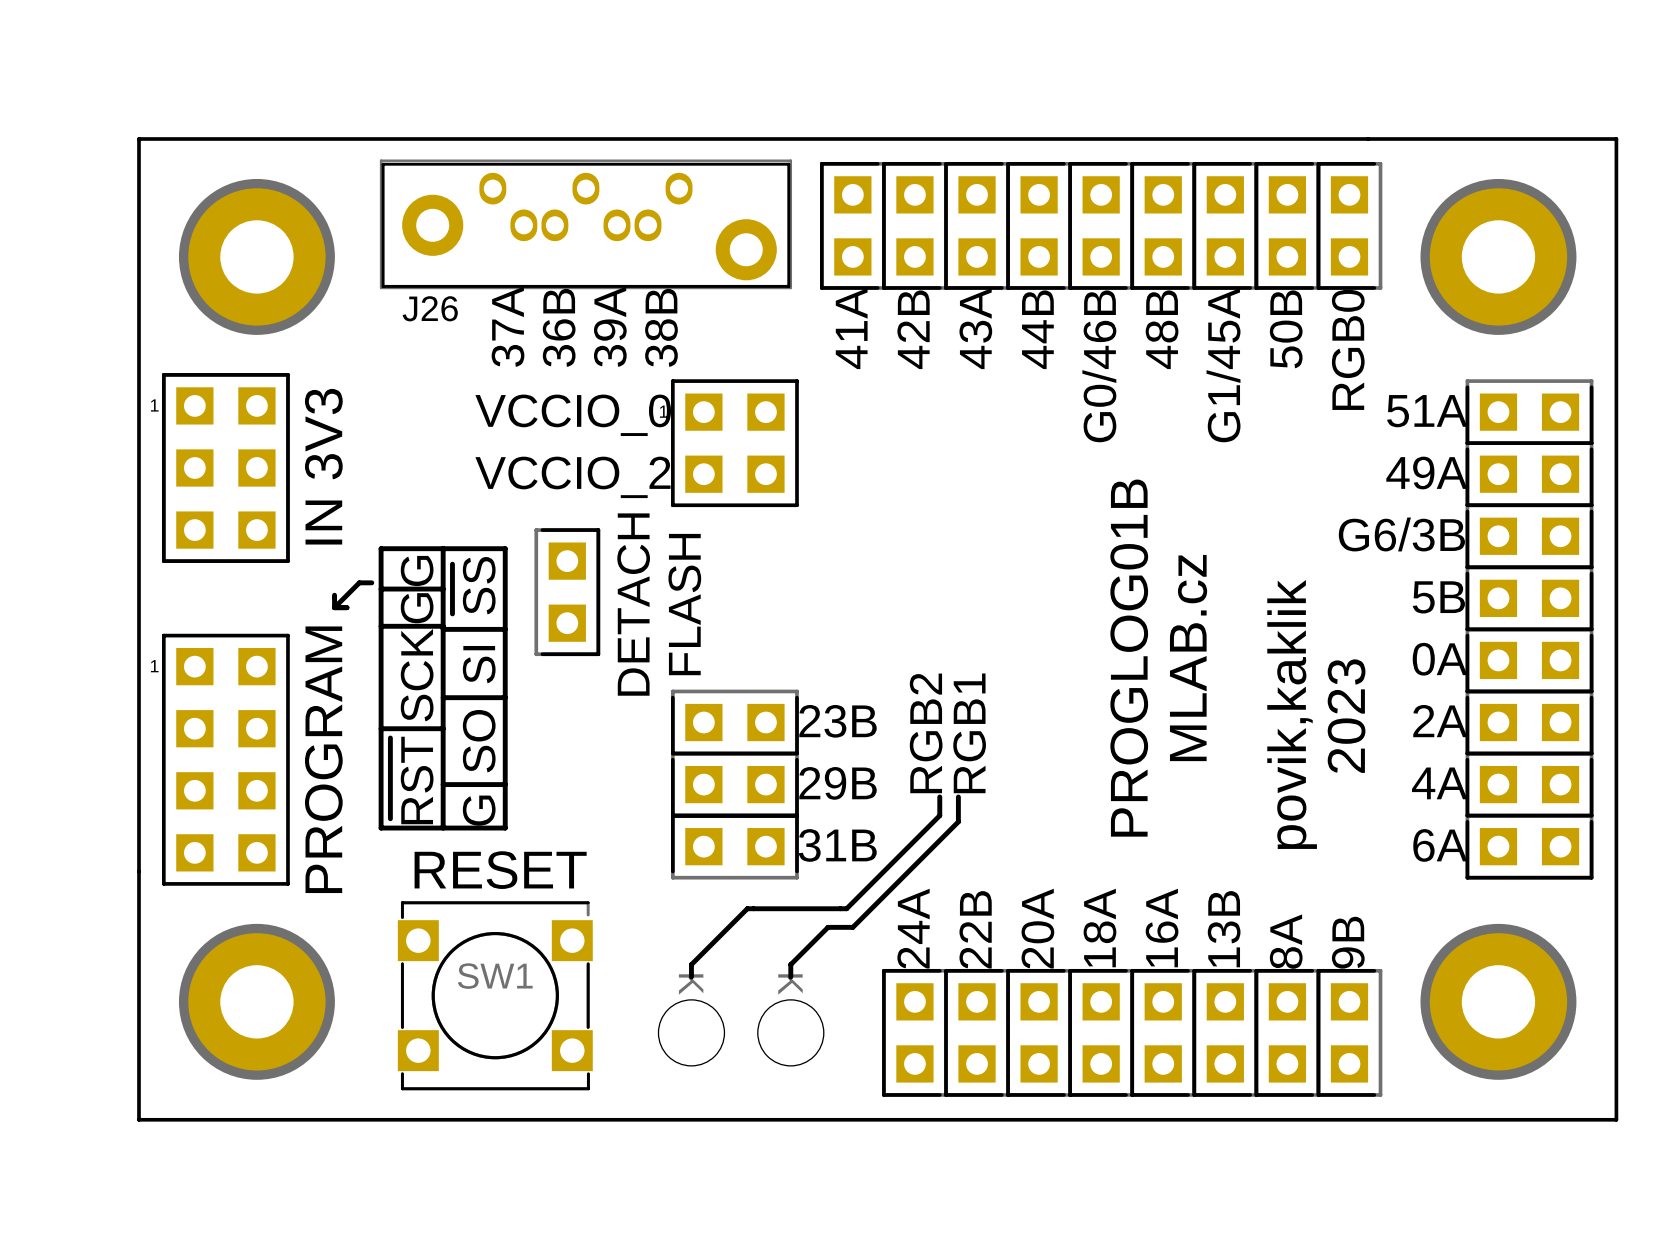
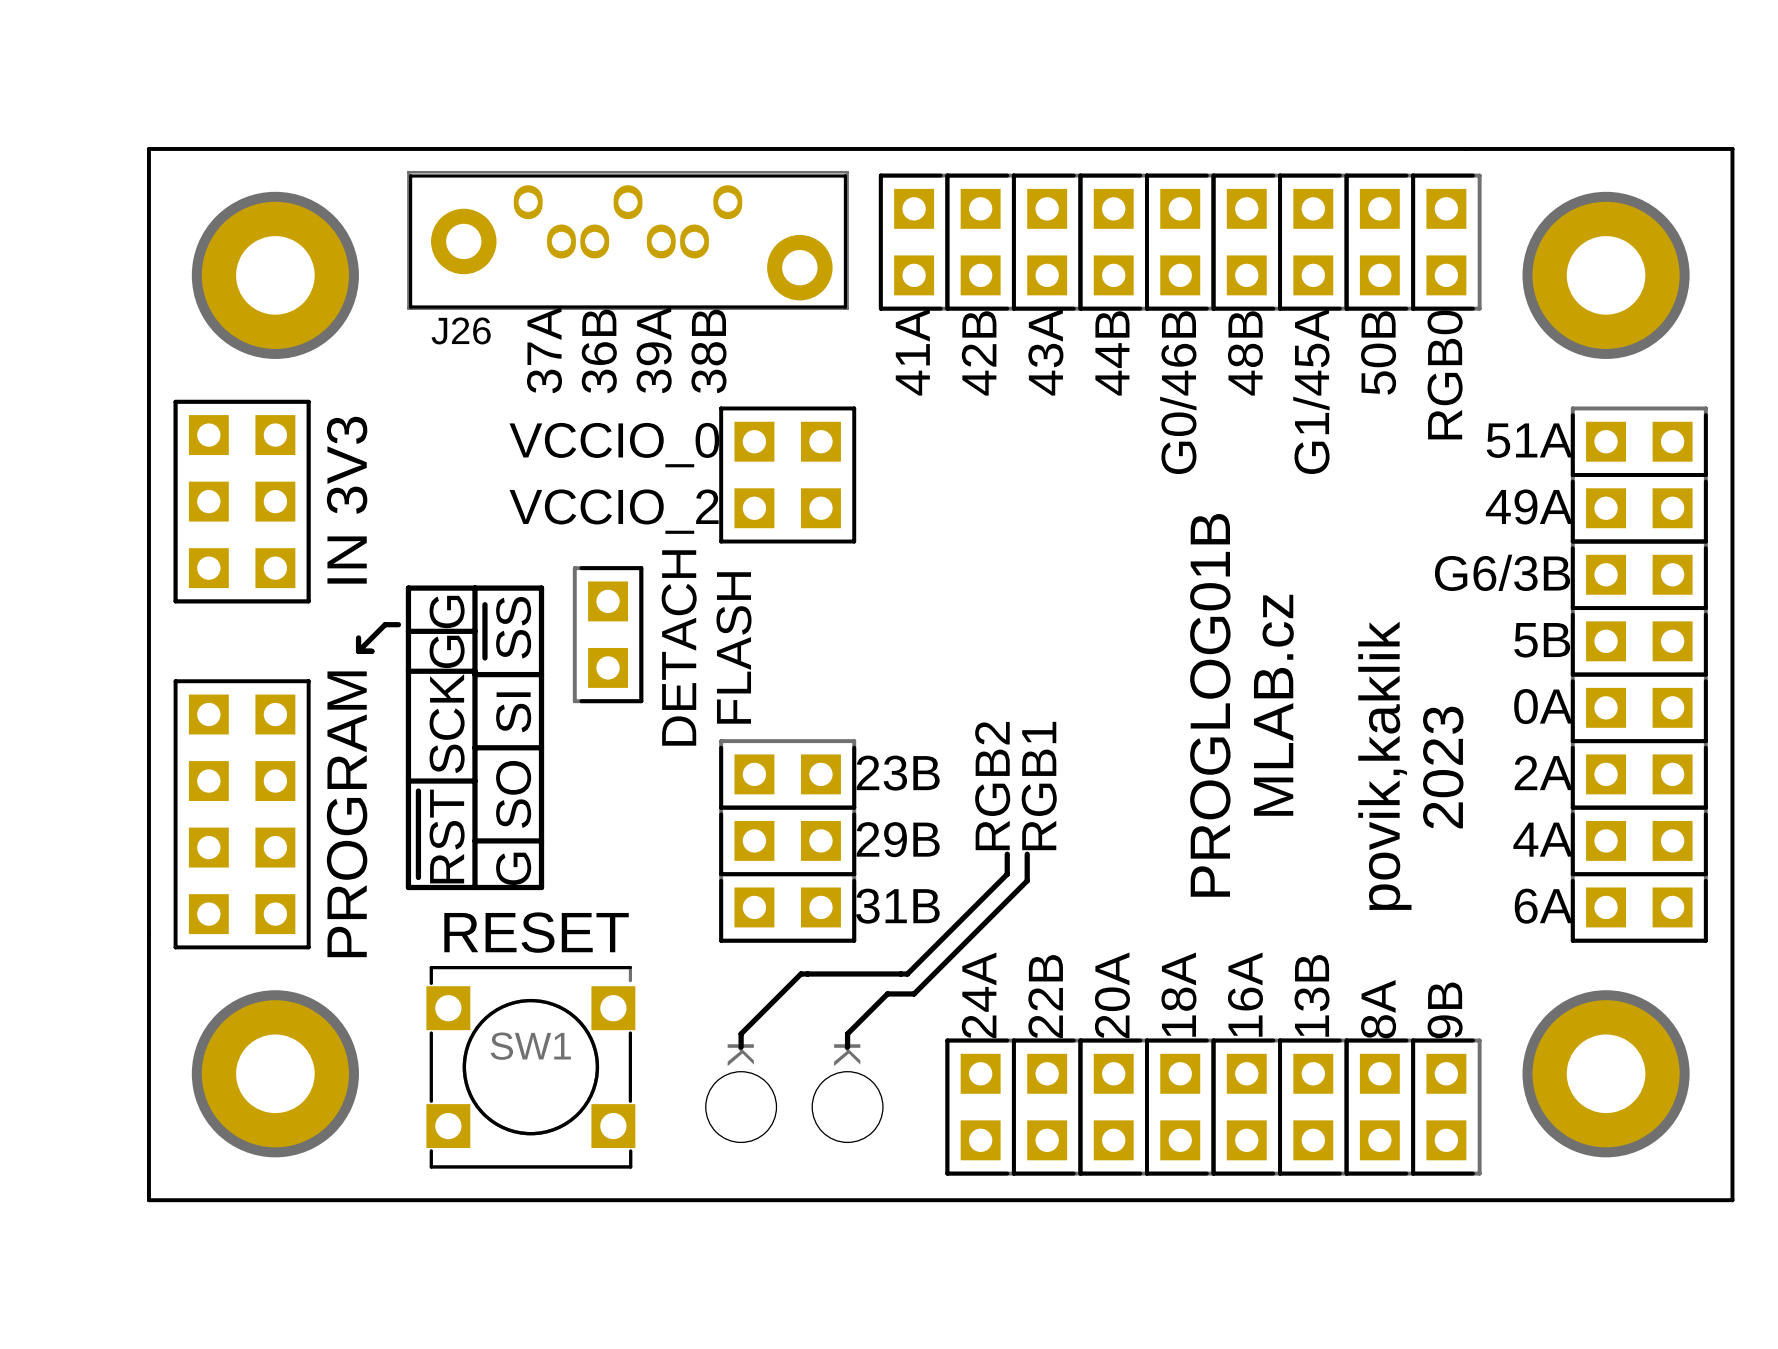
part text: 1 (154, 405) -> none
part text: 1 (663, 411) -> none
part text: 1 (154, 666) -> none
part rotation: 0° (734, 846) -> 180° (787, 907)

